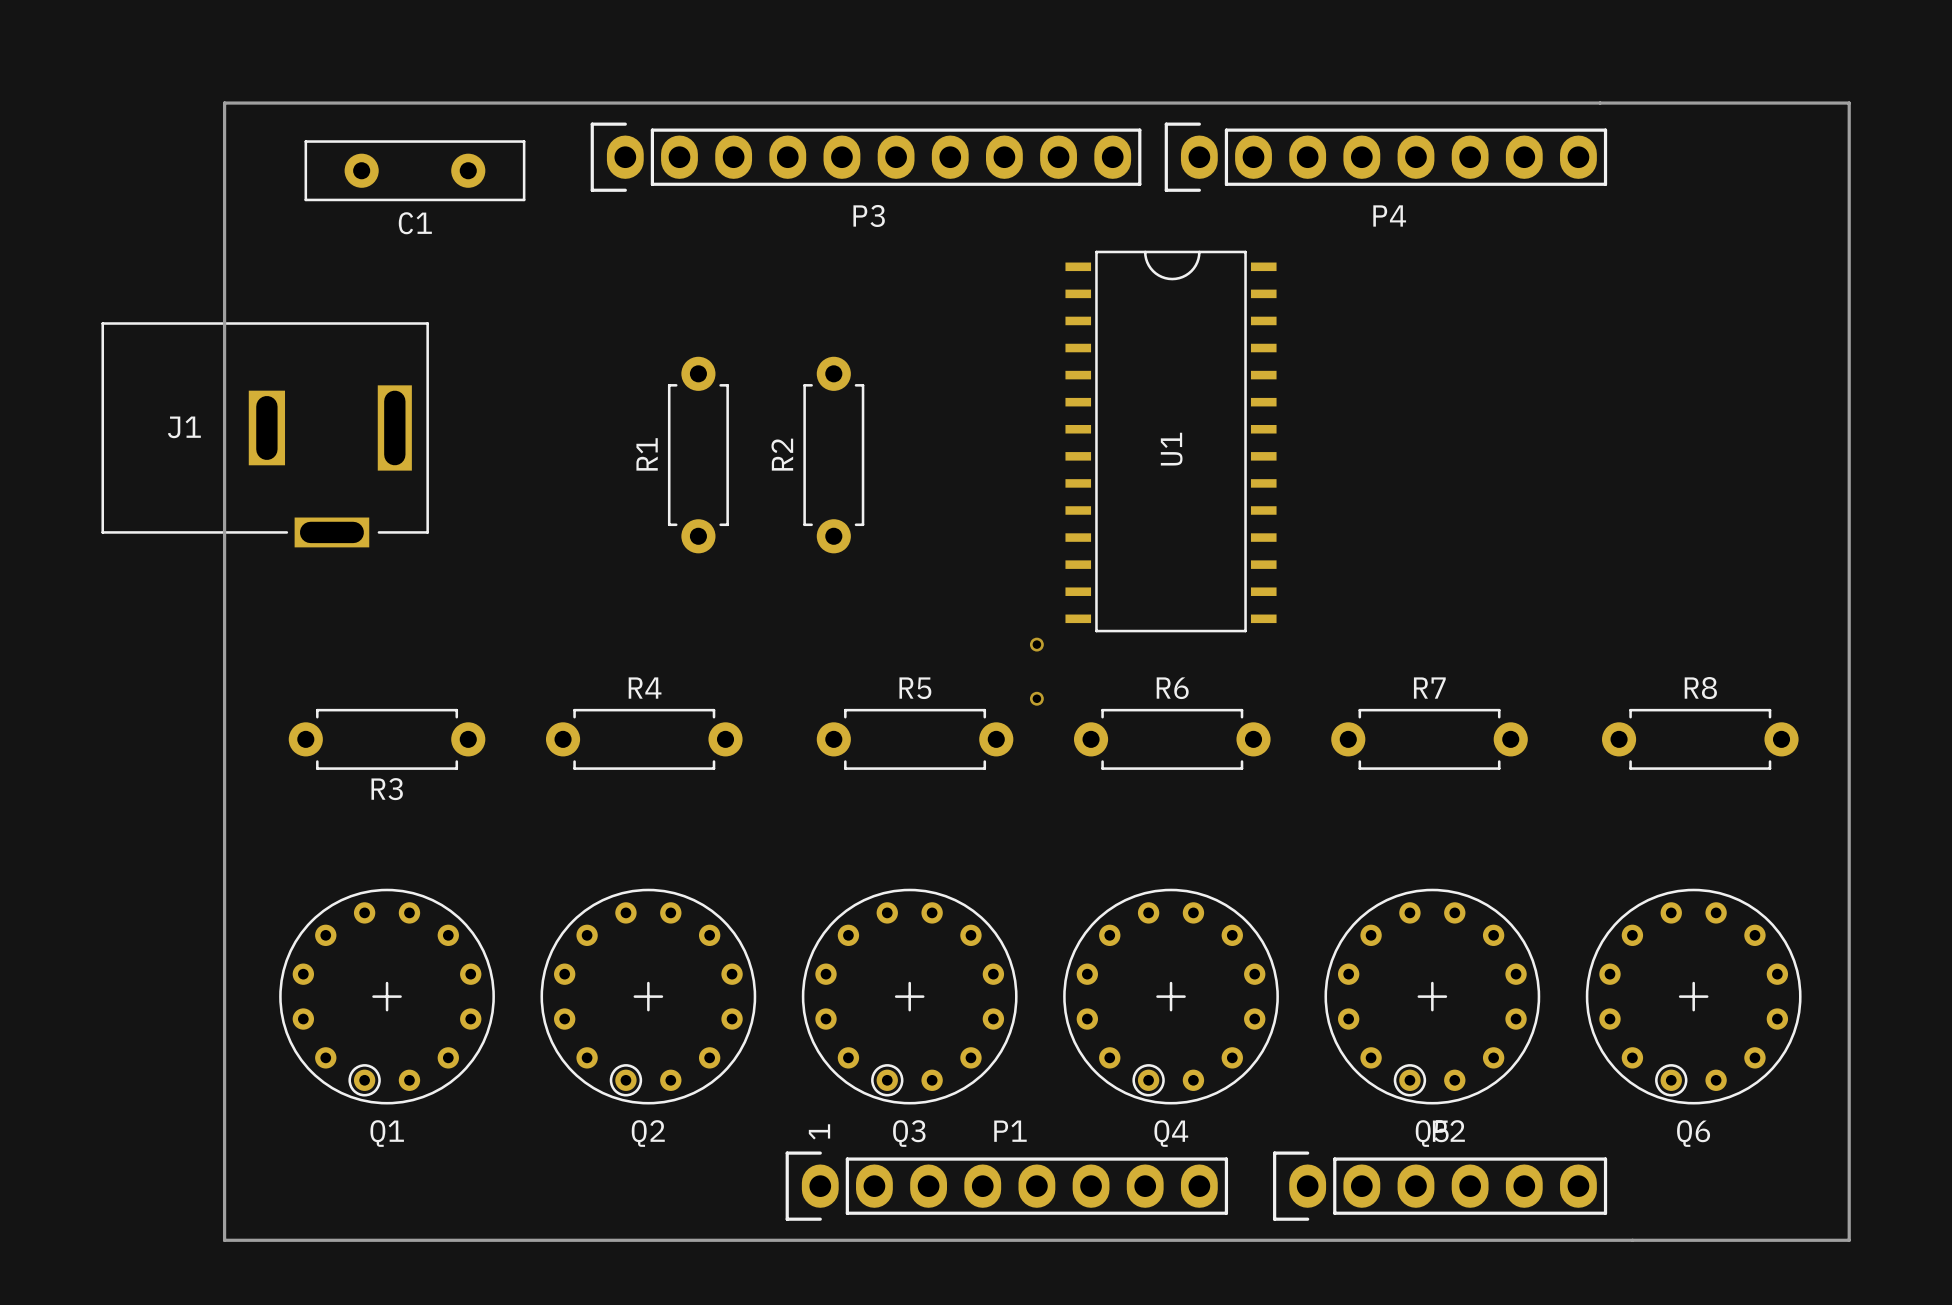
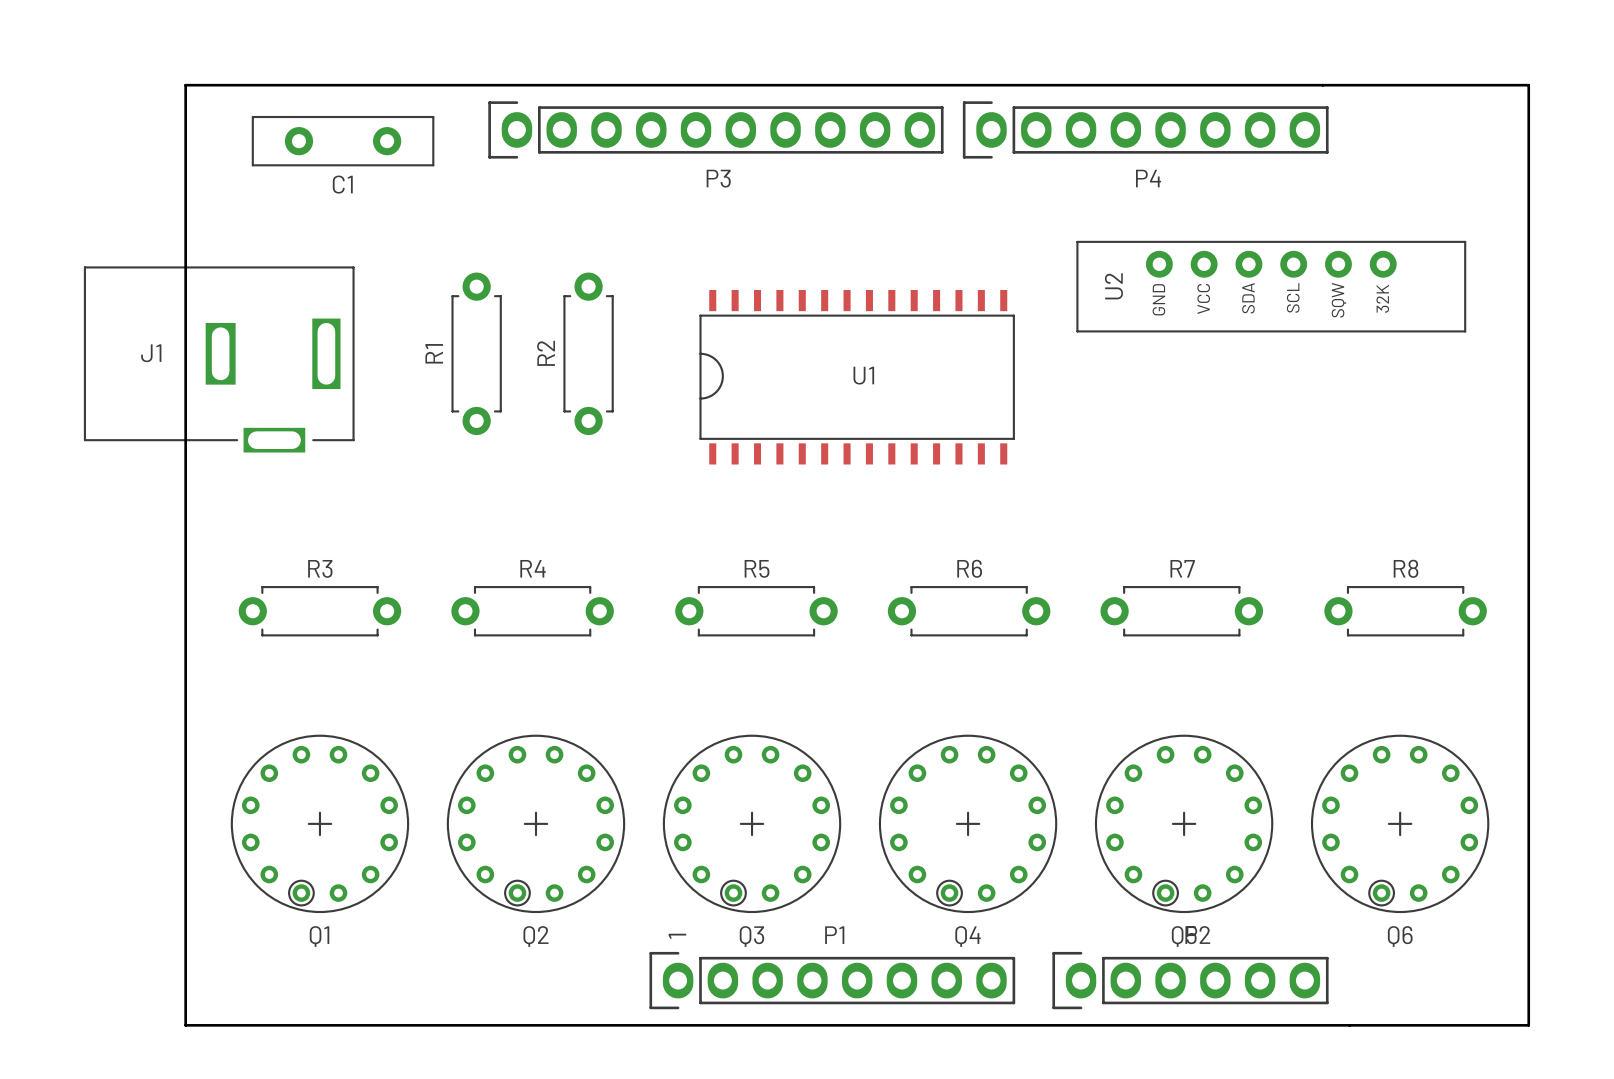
U2: none -> (1271, 286)
U1 rotation: 0° (1171, 441) -> 90° counterclockwise (857, 377)
R1 position: (698, 455) -> (476, 353)
R2 position: (833, 455) -> (588, 353)
via: (1036, 644) -> none
via: (1036, 698) -> none
R3 name position: R3 (387, 789) -> R3 (320, 568)

